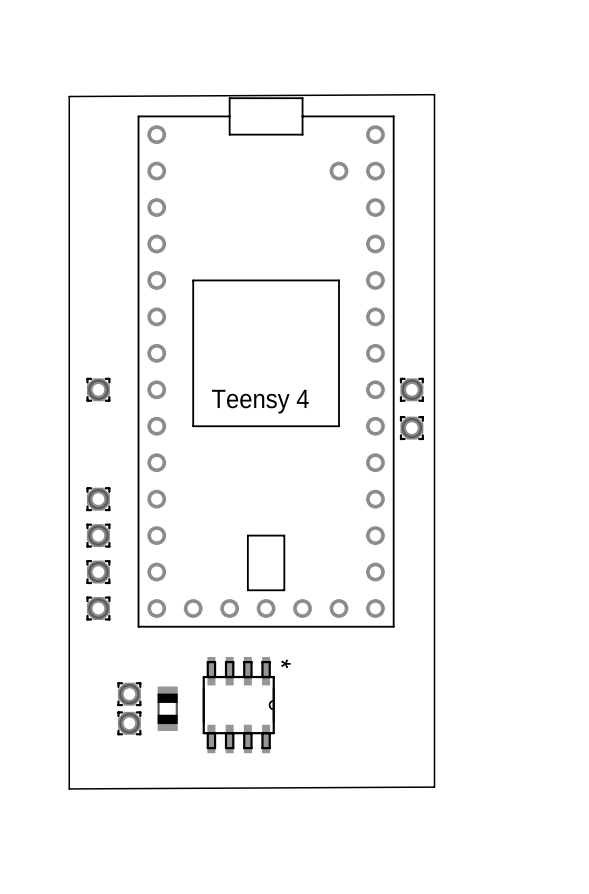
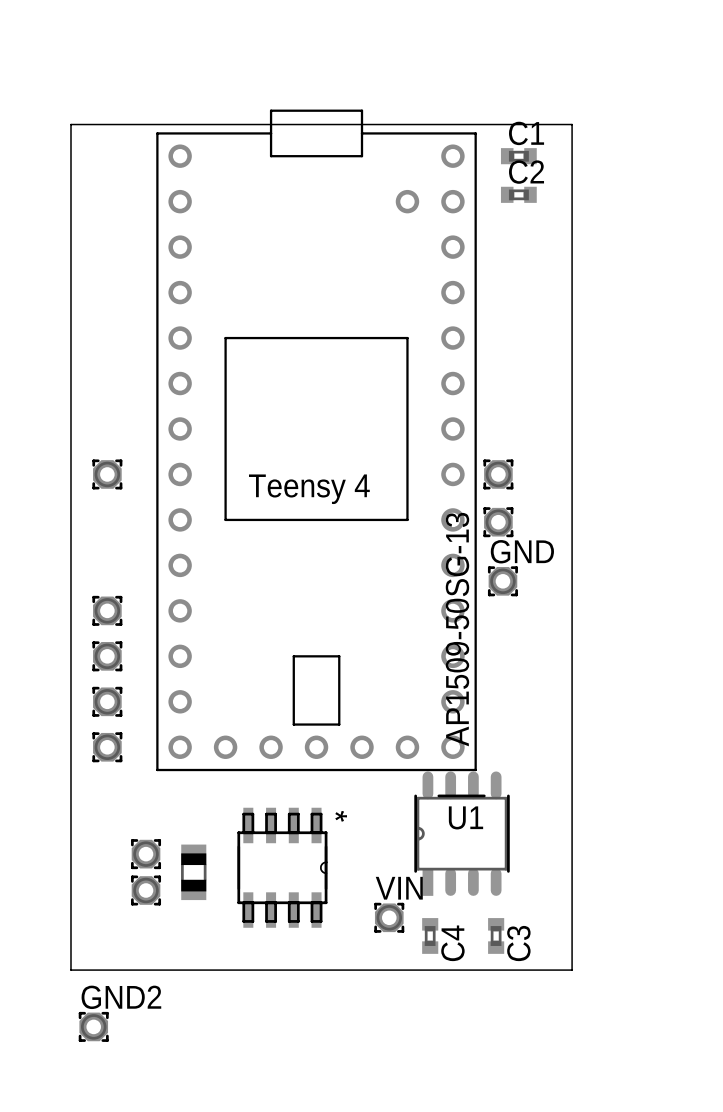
board edge: (69, 109) (69, 96) (434, 94) (434, 787) (69, 788) (69, 787) -> (70, 124) (572, 124) (572, 970) (70, 970)
C1: none -> (518, 156)
C2: none -> (518, 194)
GND: none -> (502, 581)
U1: none -> AP1509-50SG-13 (462, 833)
VIN: none -> (389, 917)
C4: none -> (430, 935)
C3: none -> (496, 935)
GND2: none -> (93, 1026)

